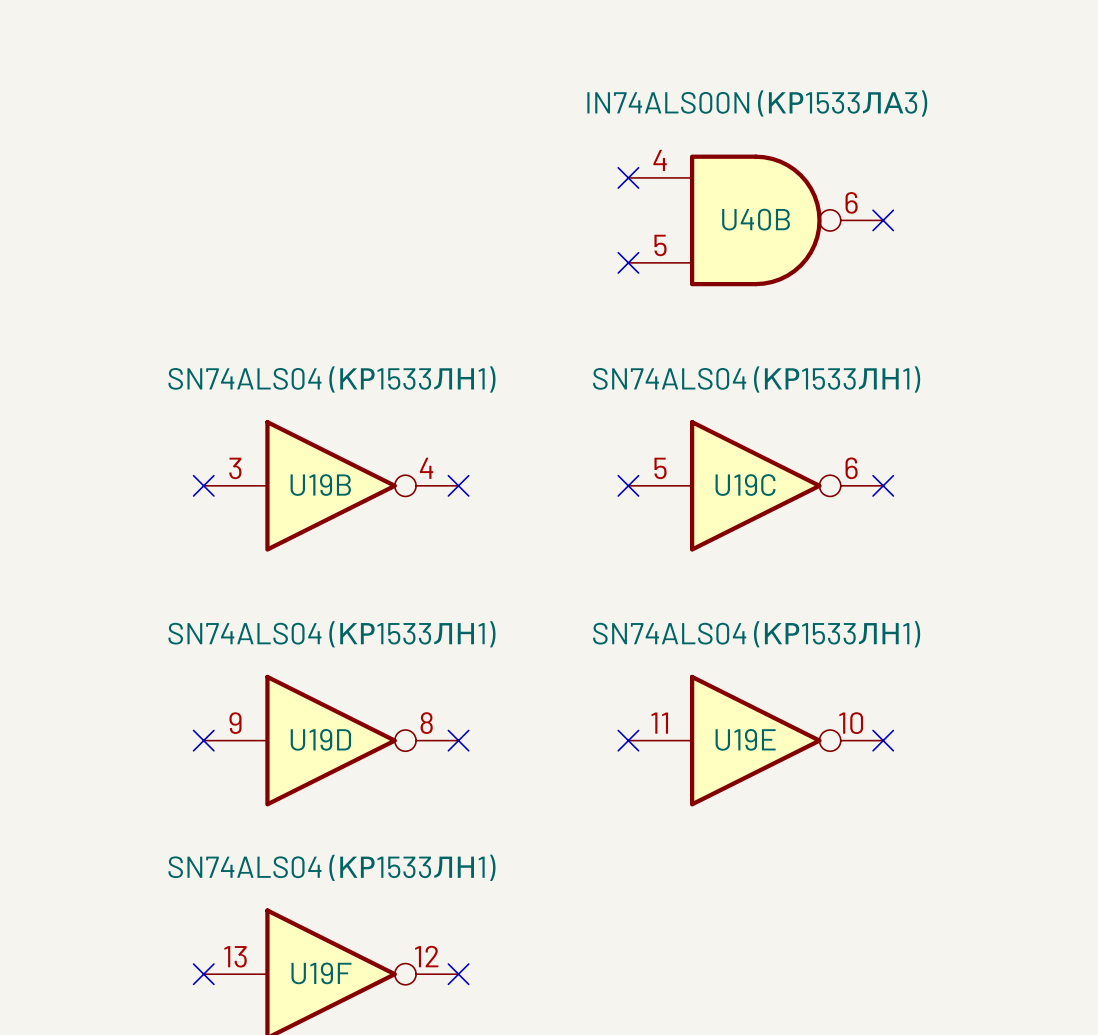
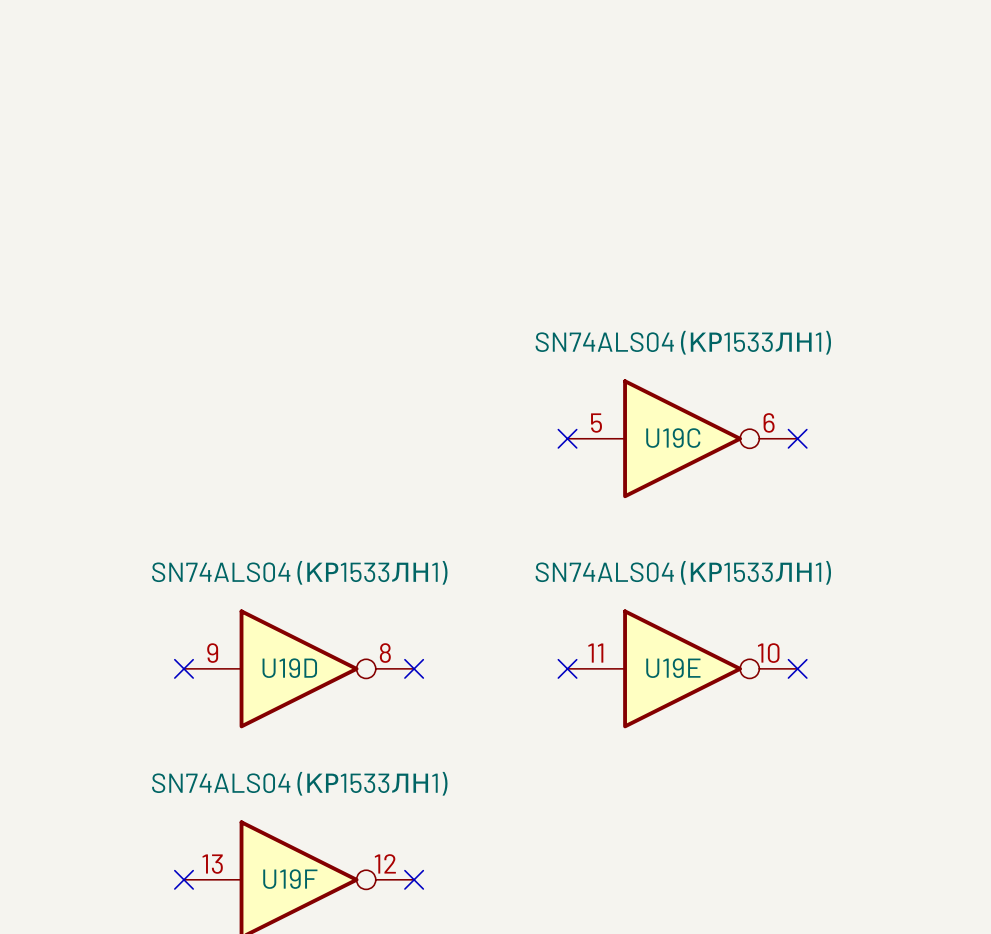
no-connect mark: (628, 177) -> none
U40B: IN74ALS00N (КР1533ЛА3) (755, 220) -> none
no-connect mark: (883, 220) -> none
no-connect mark: (628, 262) -> none
no-connect mark: (203, 485) -> none
U19B: SN74ALS04 (КР1533ЛН1) (331, 485) -> none
no-connect mark: (458, 485) -> none

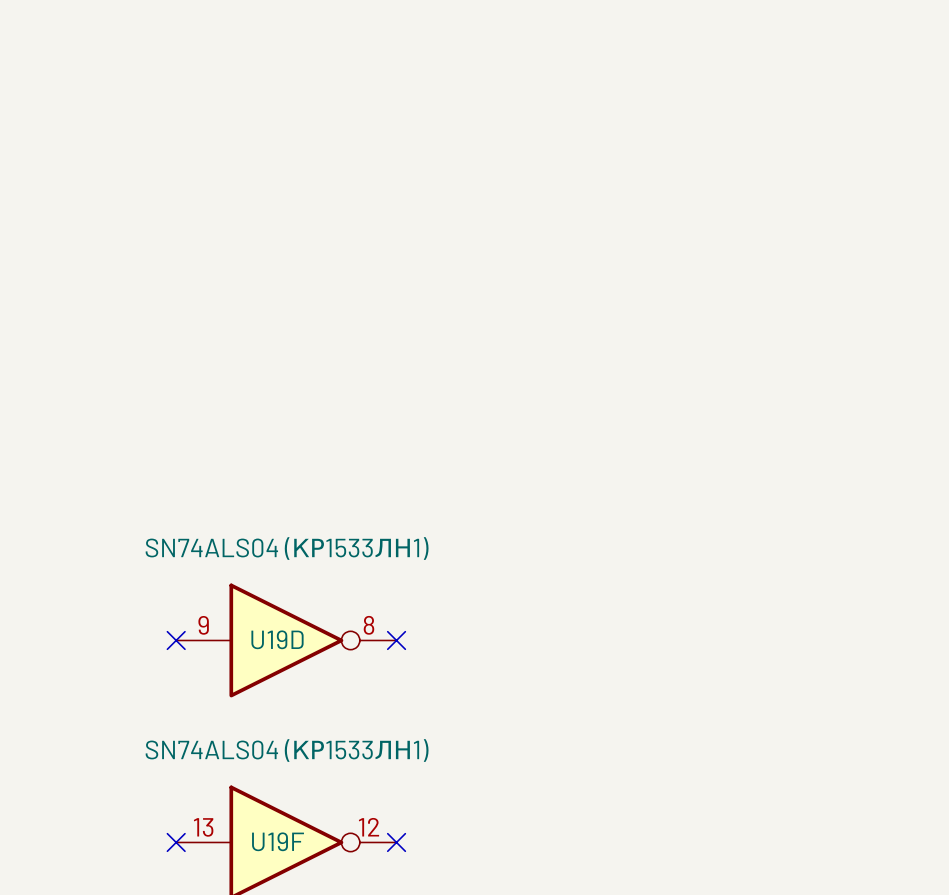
no-connect mark: (567, 438) -> none
U19C: SN74ALS04 (КР1533ЛН1) (682, 438) -> none
no-connect mark: (797, 438) -> none
no-connect mark: (567, 668) -> none
U19E: SN74ALS04 (КР1533ЛН1) (682, 668) -> none
no-connect mark: (797, 668) -> none

